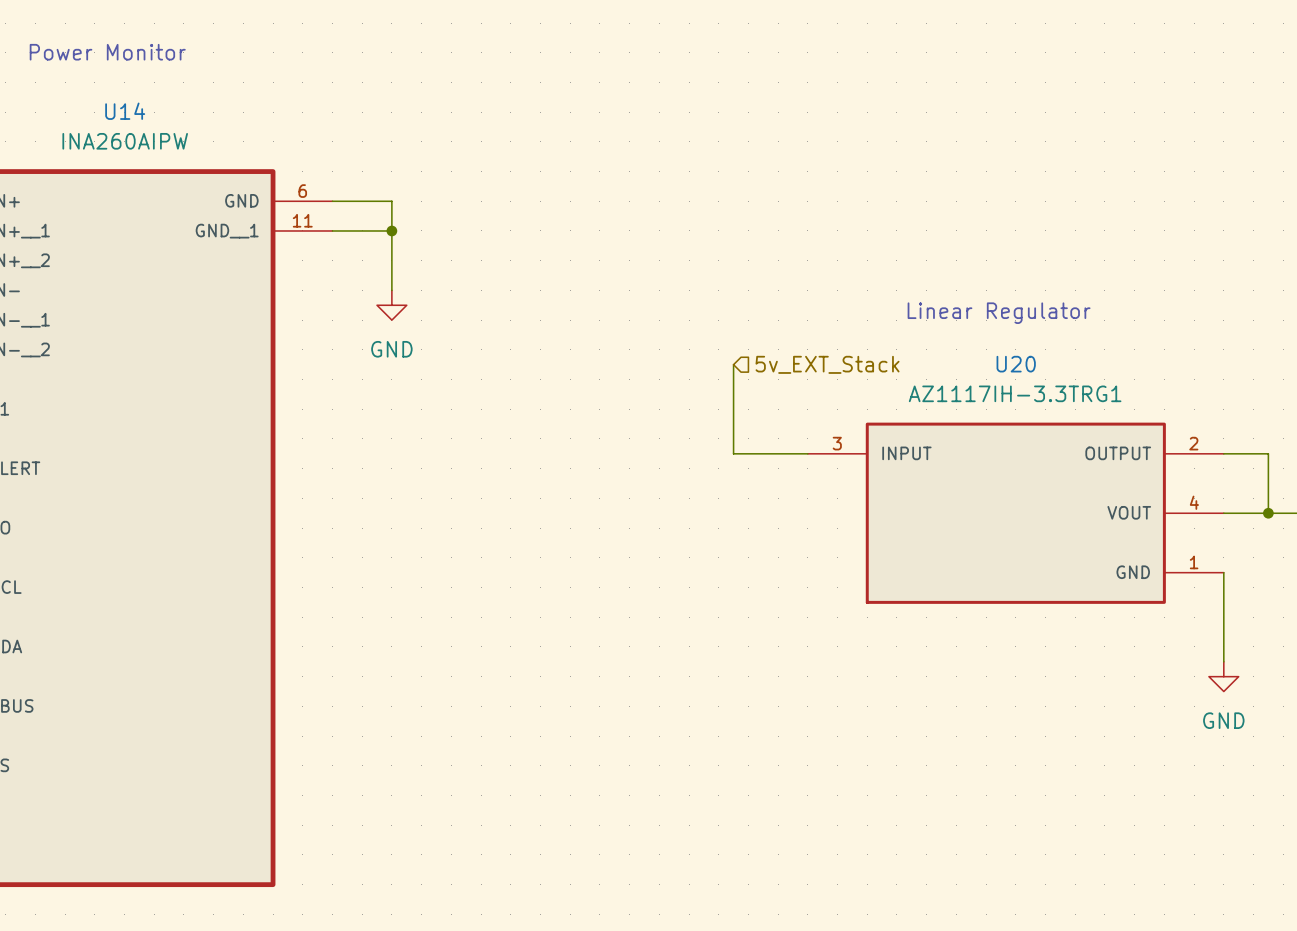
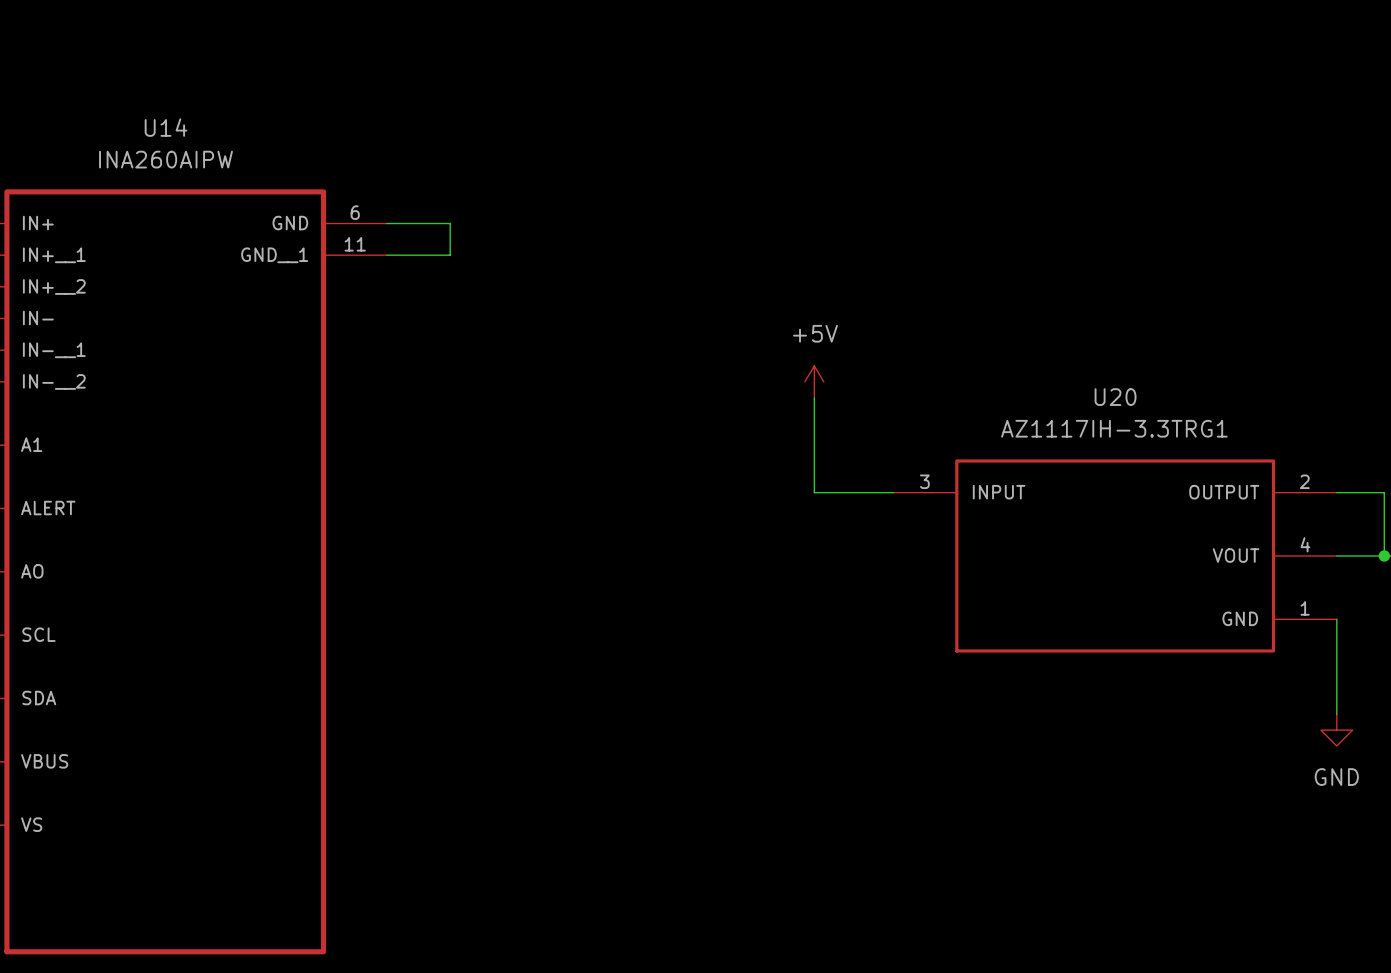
text: Power Monitor (107, 52) -> none
wire: (391, 230) (391, 290) -> none
junction: (391, 230) -> none
power symbol: GND (391, 305) -> none
text: Linear Regulator (999, 313) -> none
power symbol: none -> +5V (814, 381)
hierarchical label: 5v_EXT_Stack (827, 364) -> none

